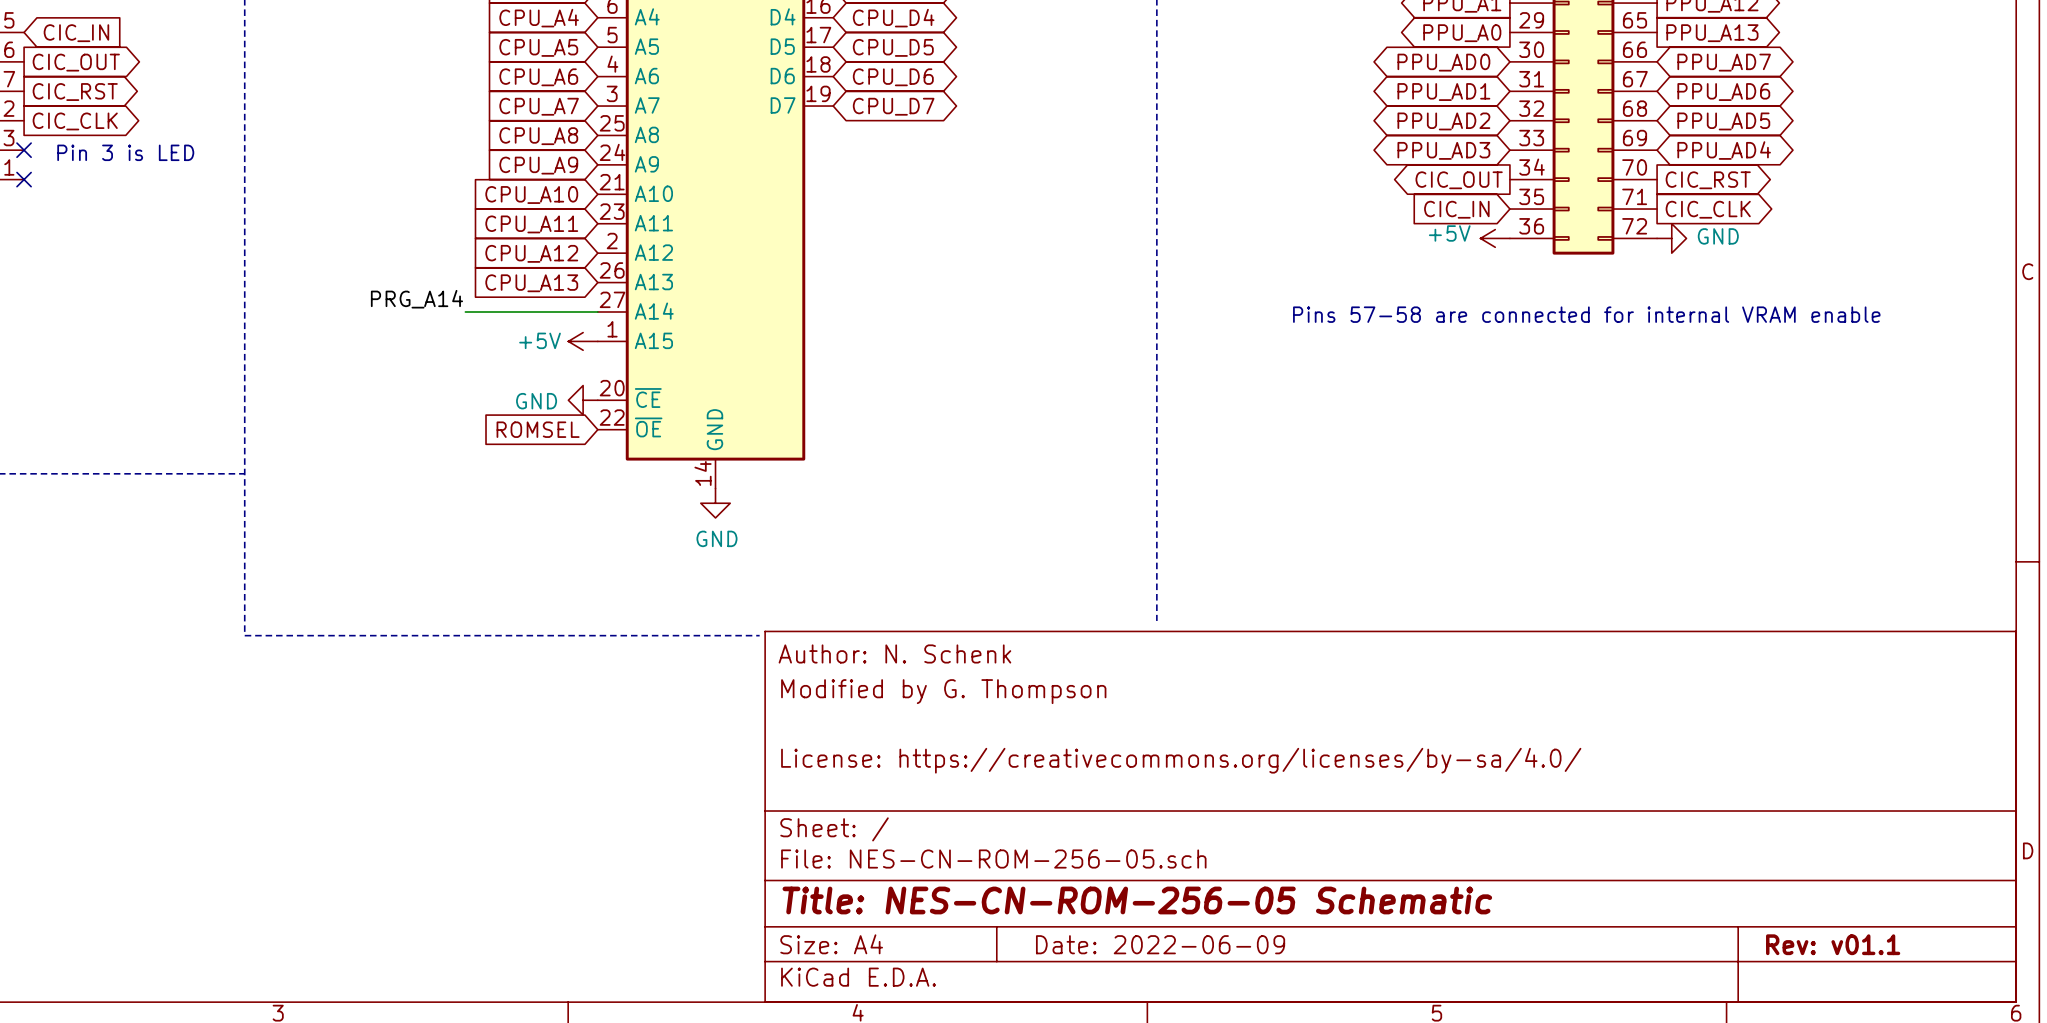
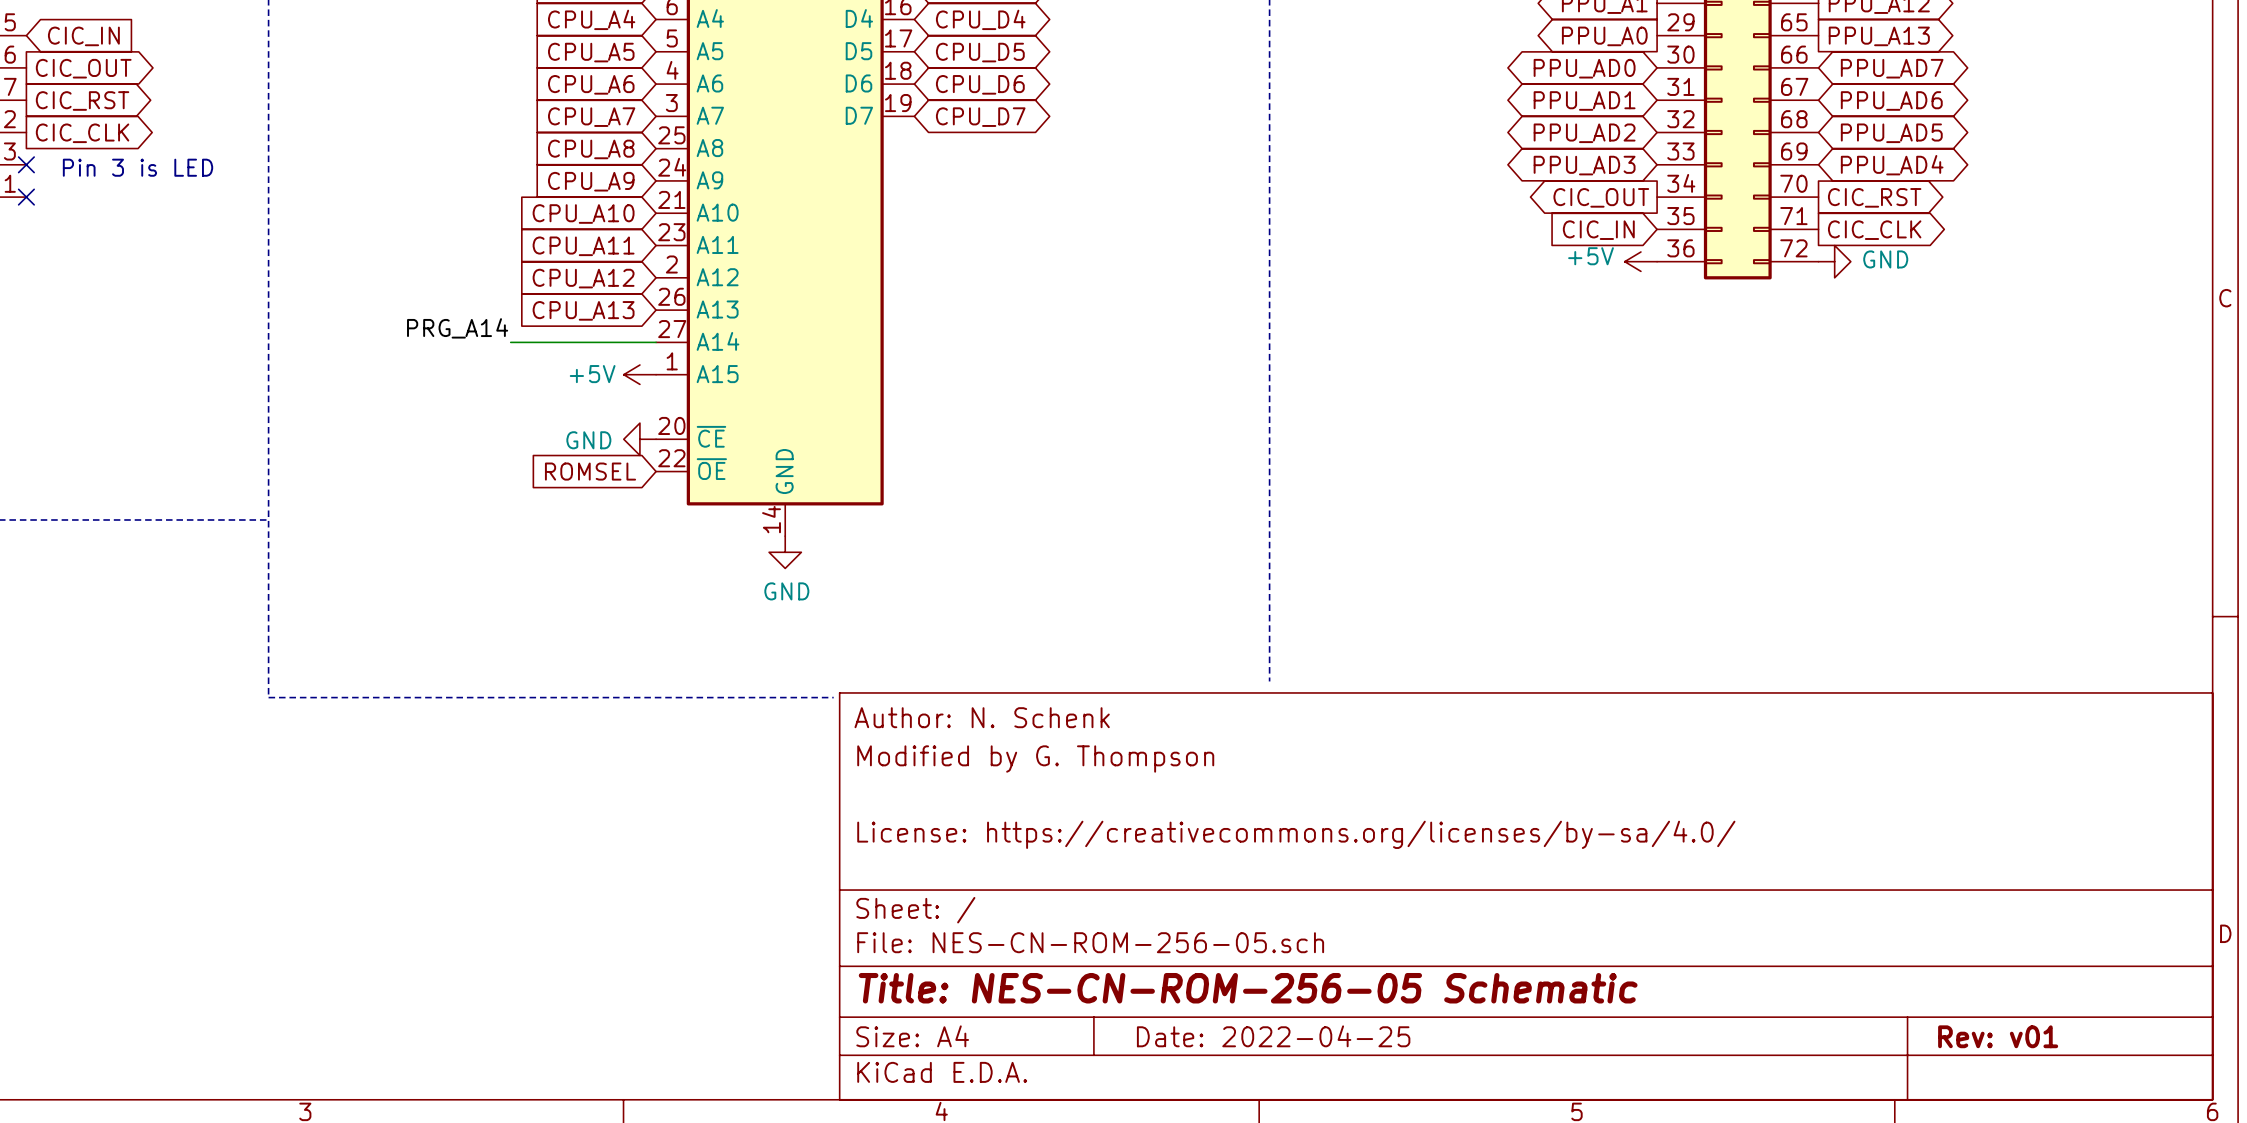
text: Pins 57-58 are connected for internal VRAM enable (1586, 314) -> none
title block: Date: 2022-06-09 (1160, 944) -> Date: 2022-04-25 (1273, 1036)
title block: Rev: v01.1 (1833, 944) -> Rev: v01 (1998, 1036)

